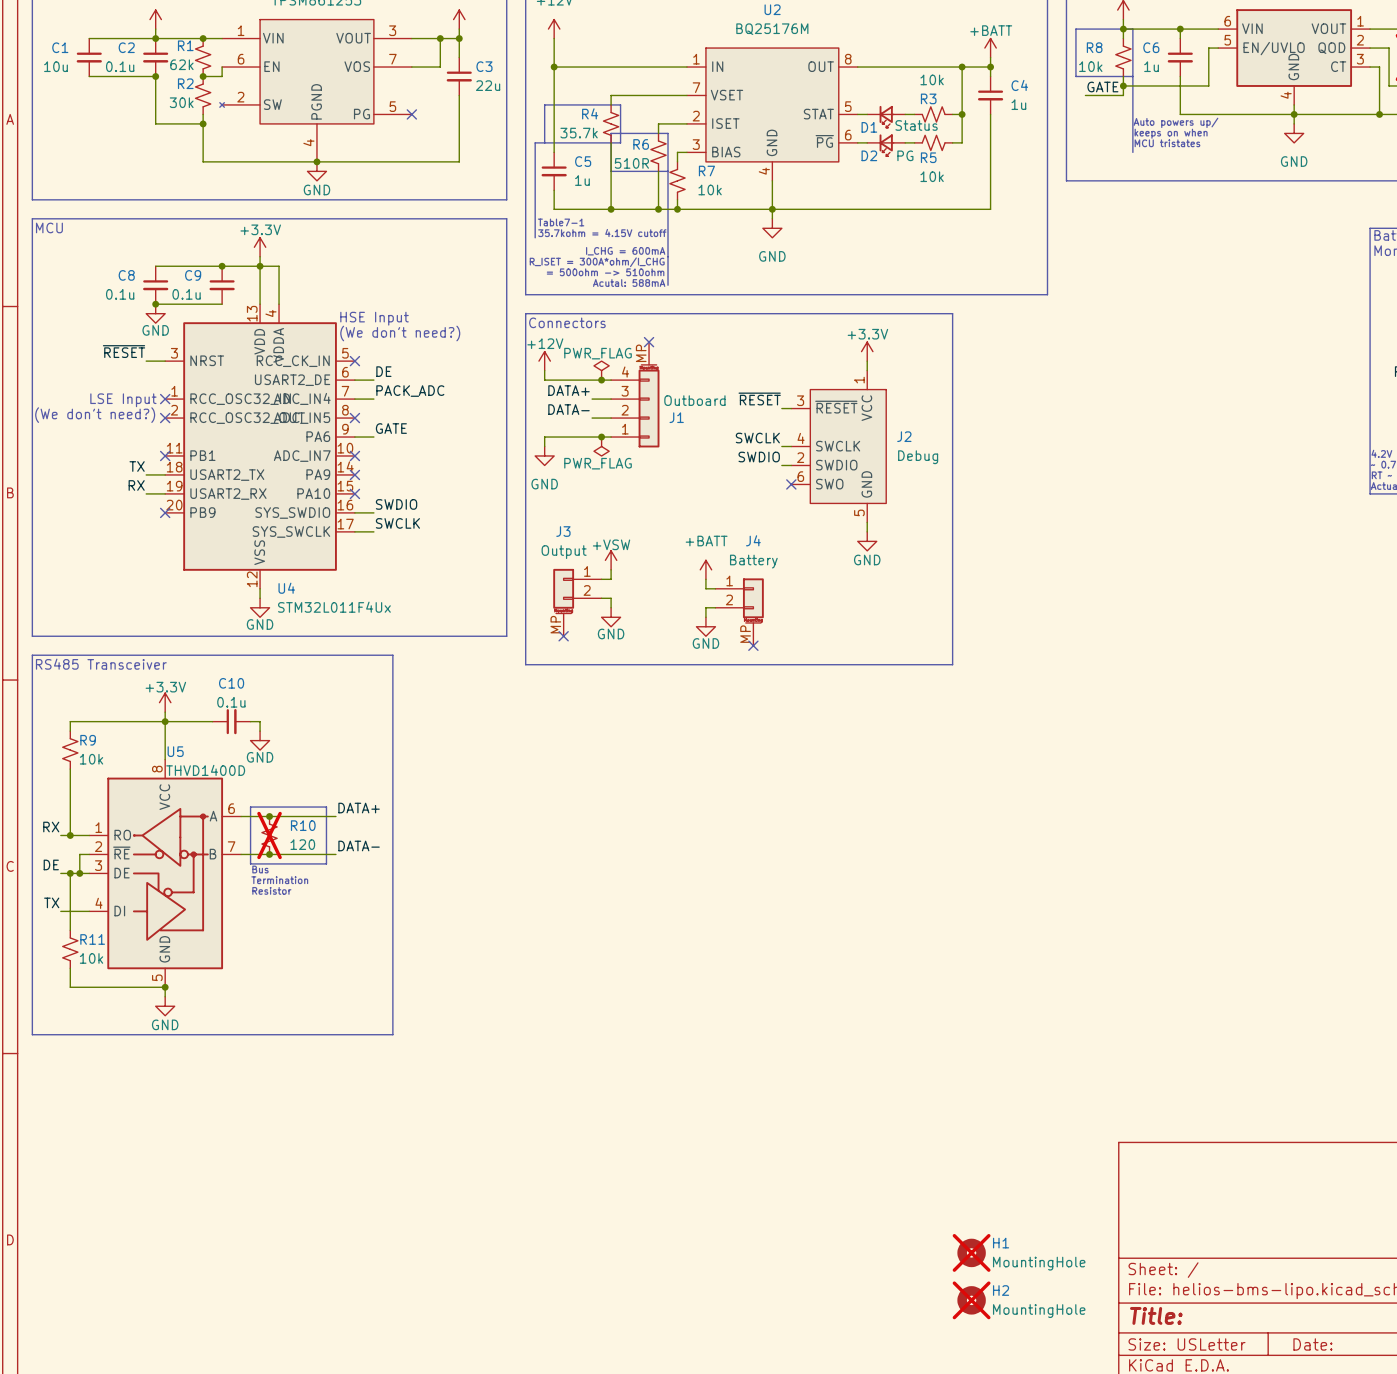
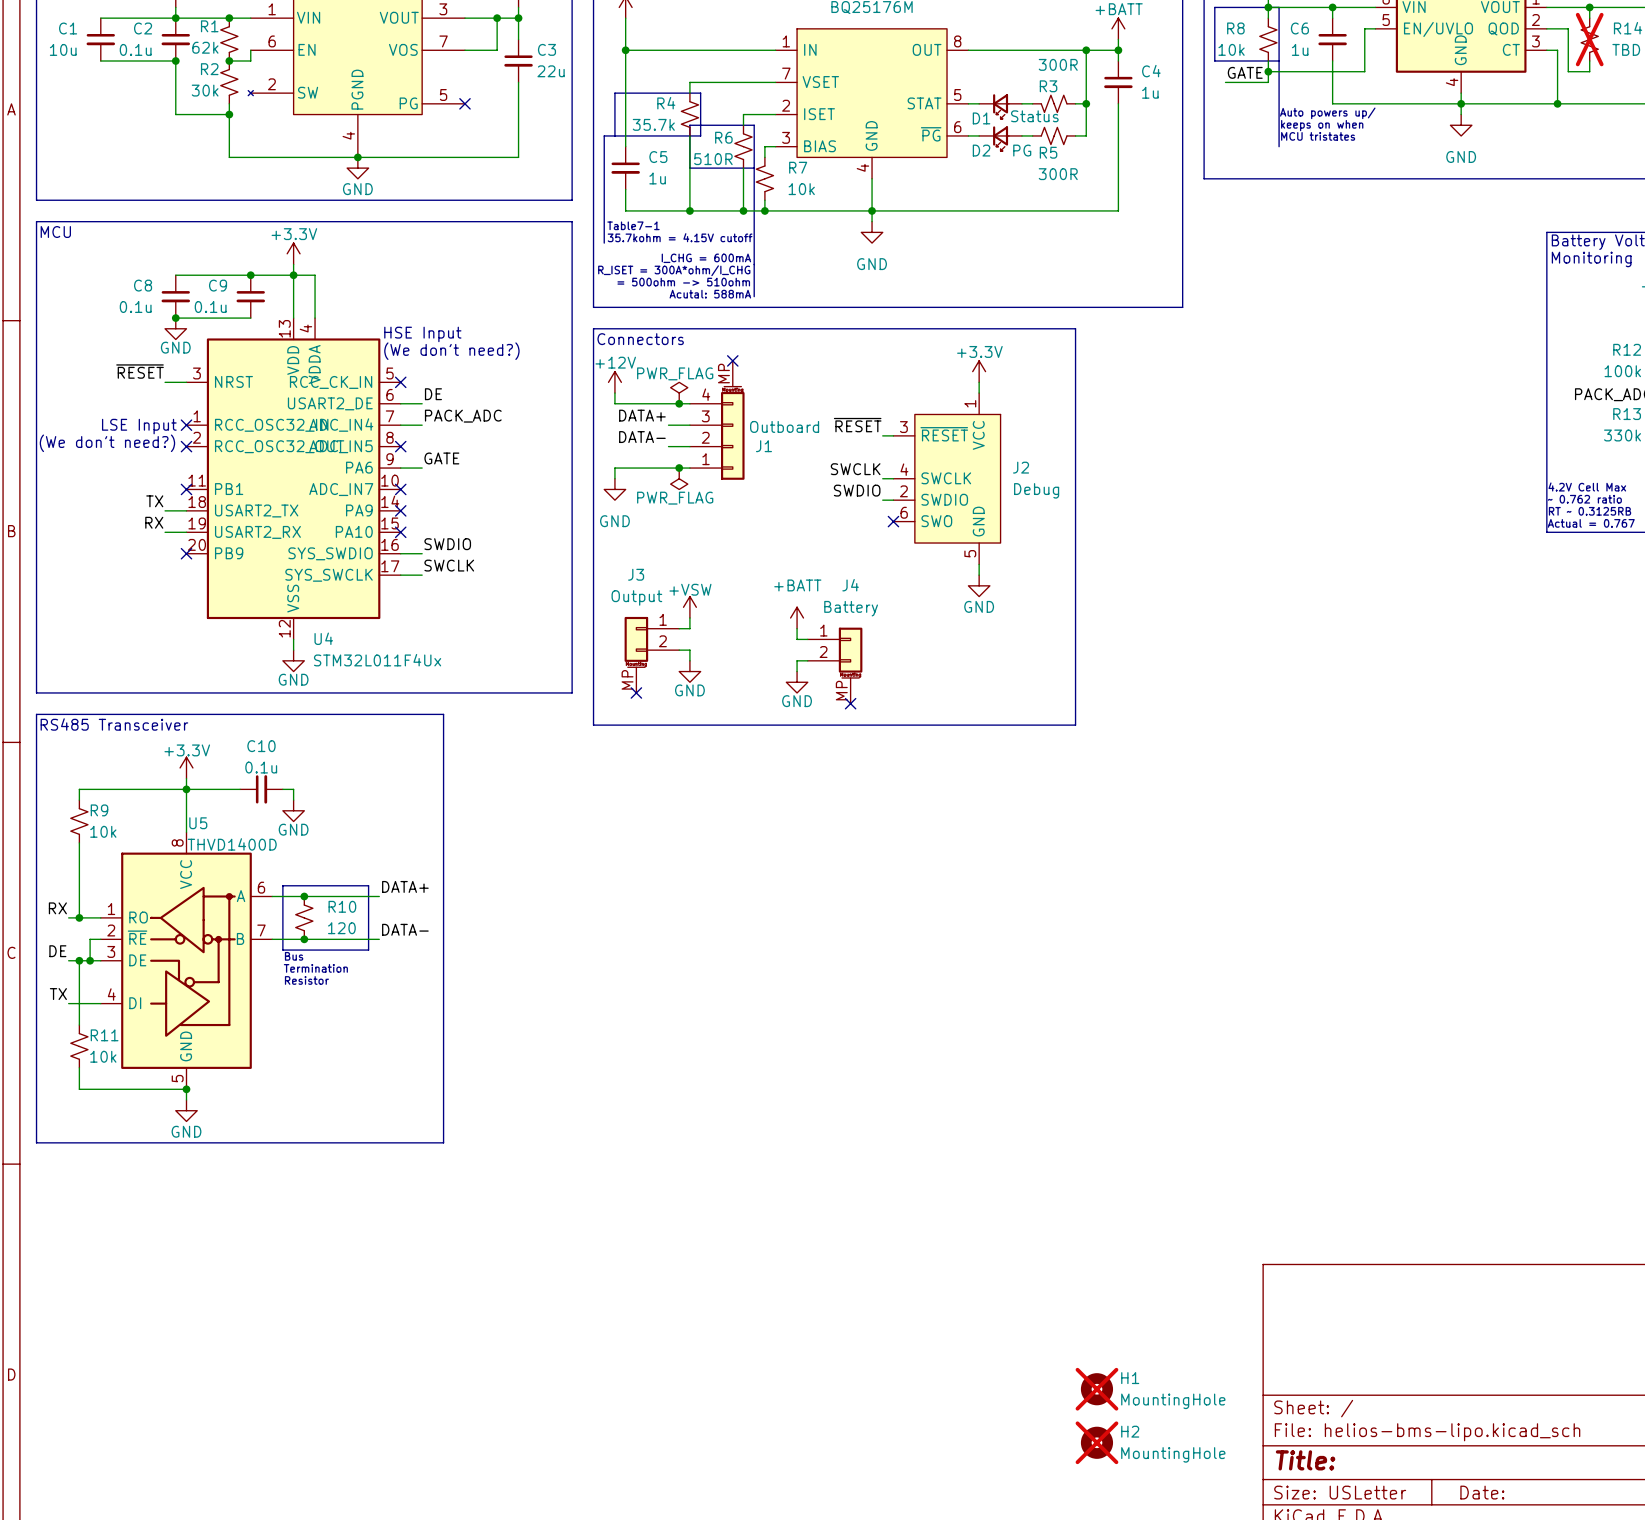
R3 value: 10k (932, 79) -> 300R (1058, 64)
R5 value: 10k (932, 176) -> 300R (1058, 174)
R10 do-not-place cross: (269, 835) -> none

